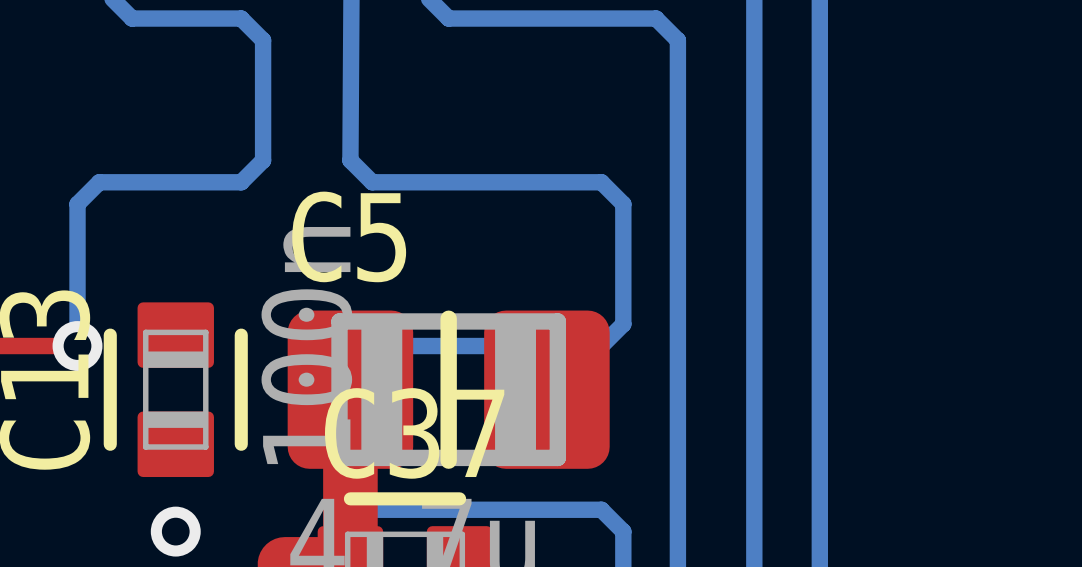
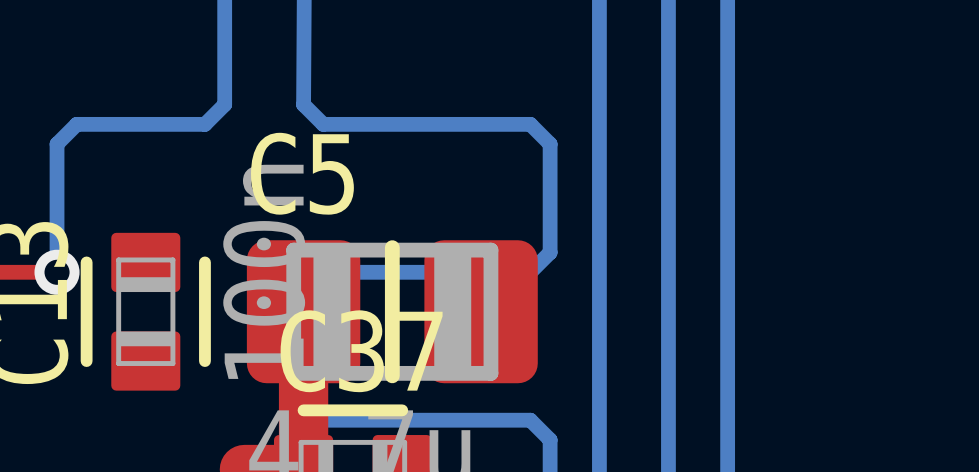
via: (175, 531) -> none

